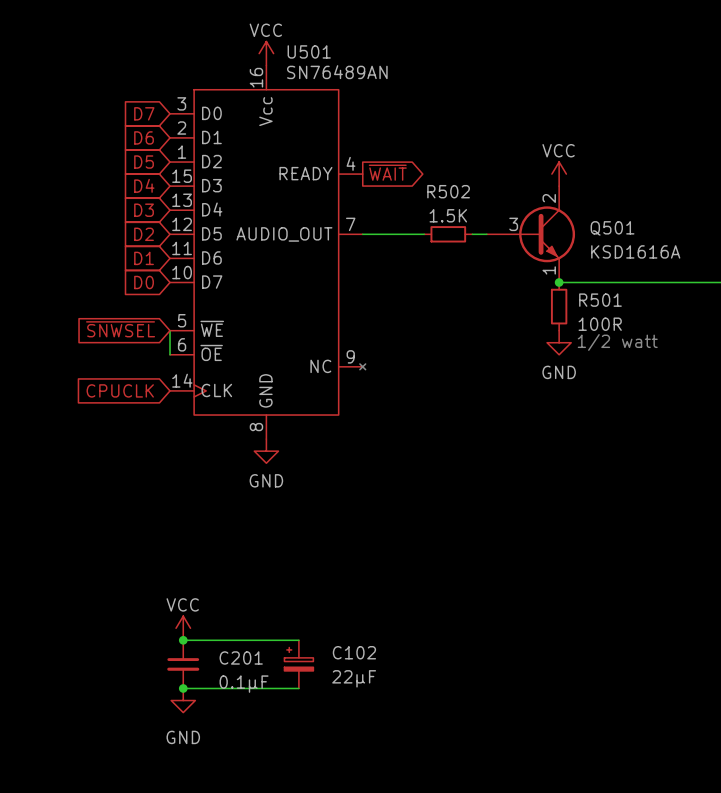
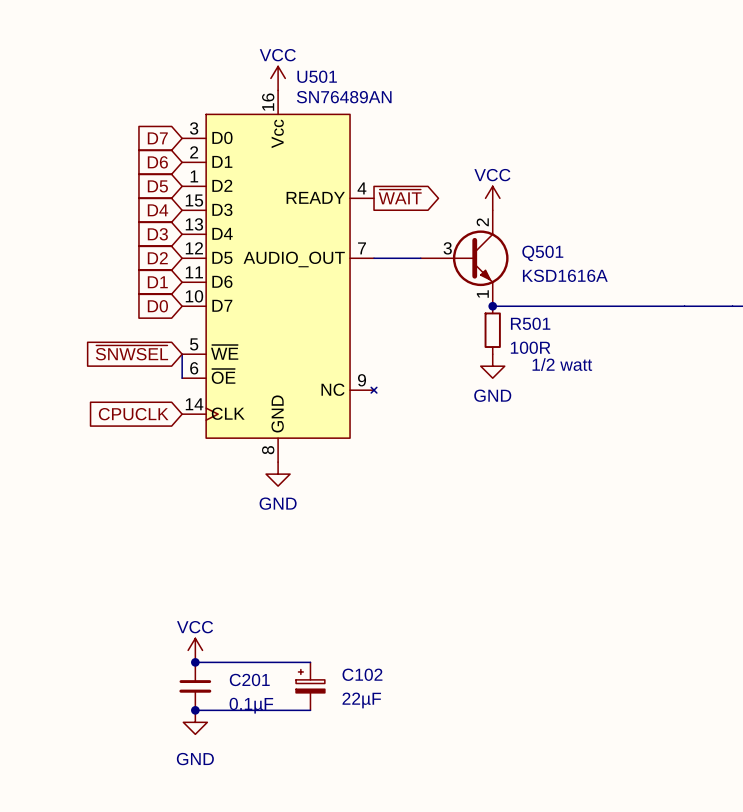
power symbol position: VCC (559, 174) -> VCC (492, 198)
R502: 1.5K (448, 234) -> none
wire: (472, 234) (486, 234) -> none
Q501 position: (530, 234) -> (464, 258)
wire: none -> (492, 306) (569, 306)
junction: none -> (492, 306)
junction: (559, 282) -> none
R501 position: (559, 306) -> (492, 330)
power symbol position: GND (559, 342) -> GND (492, 366)
text position: 1/2 watt (617, 342) -> 1/2 watt (562, 364)

